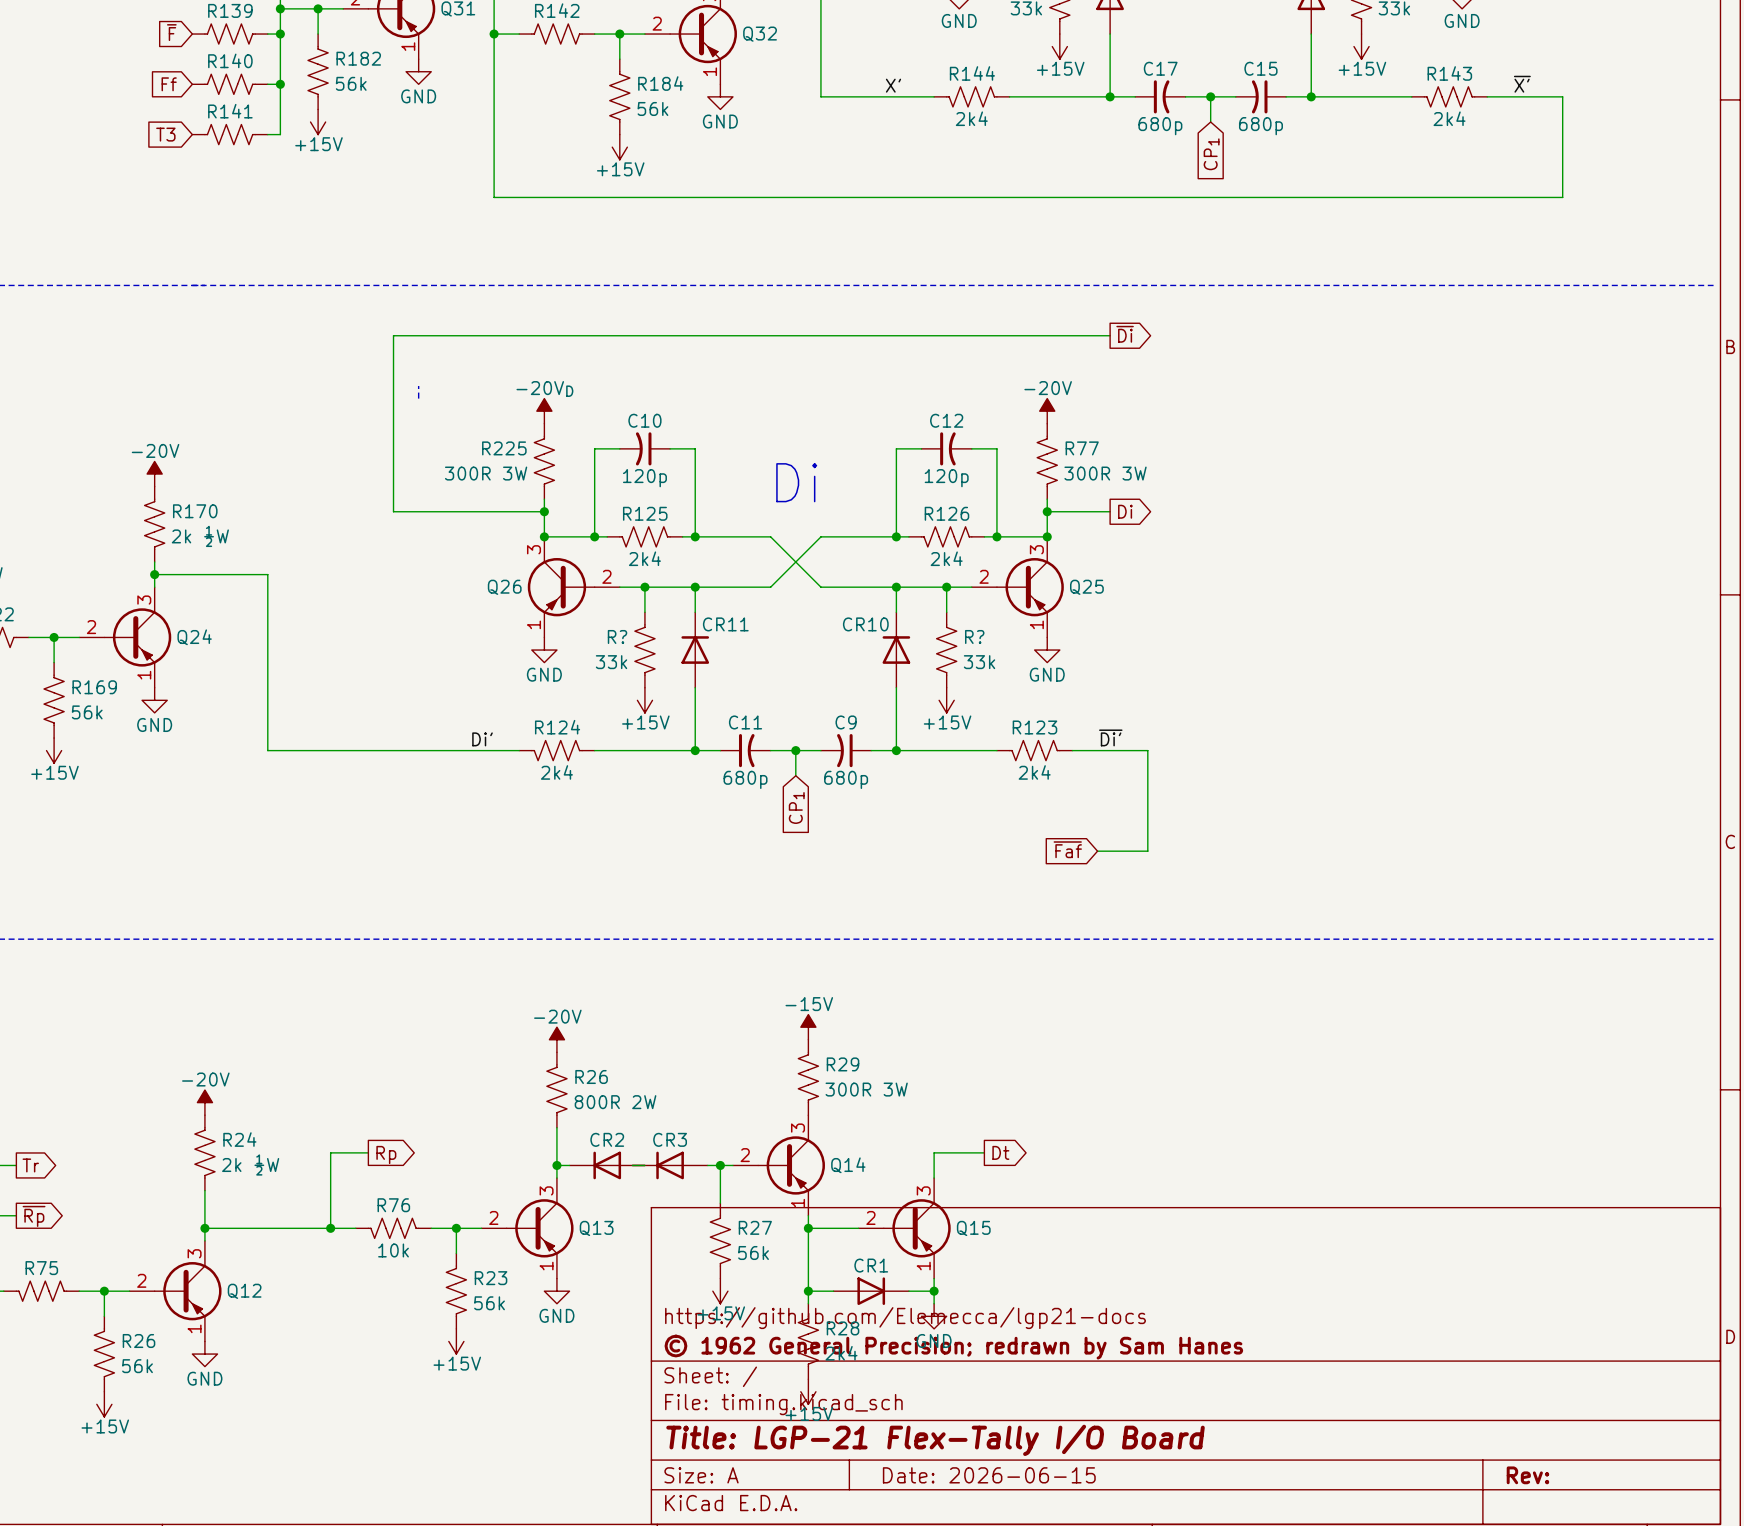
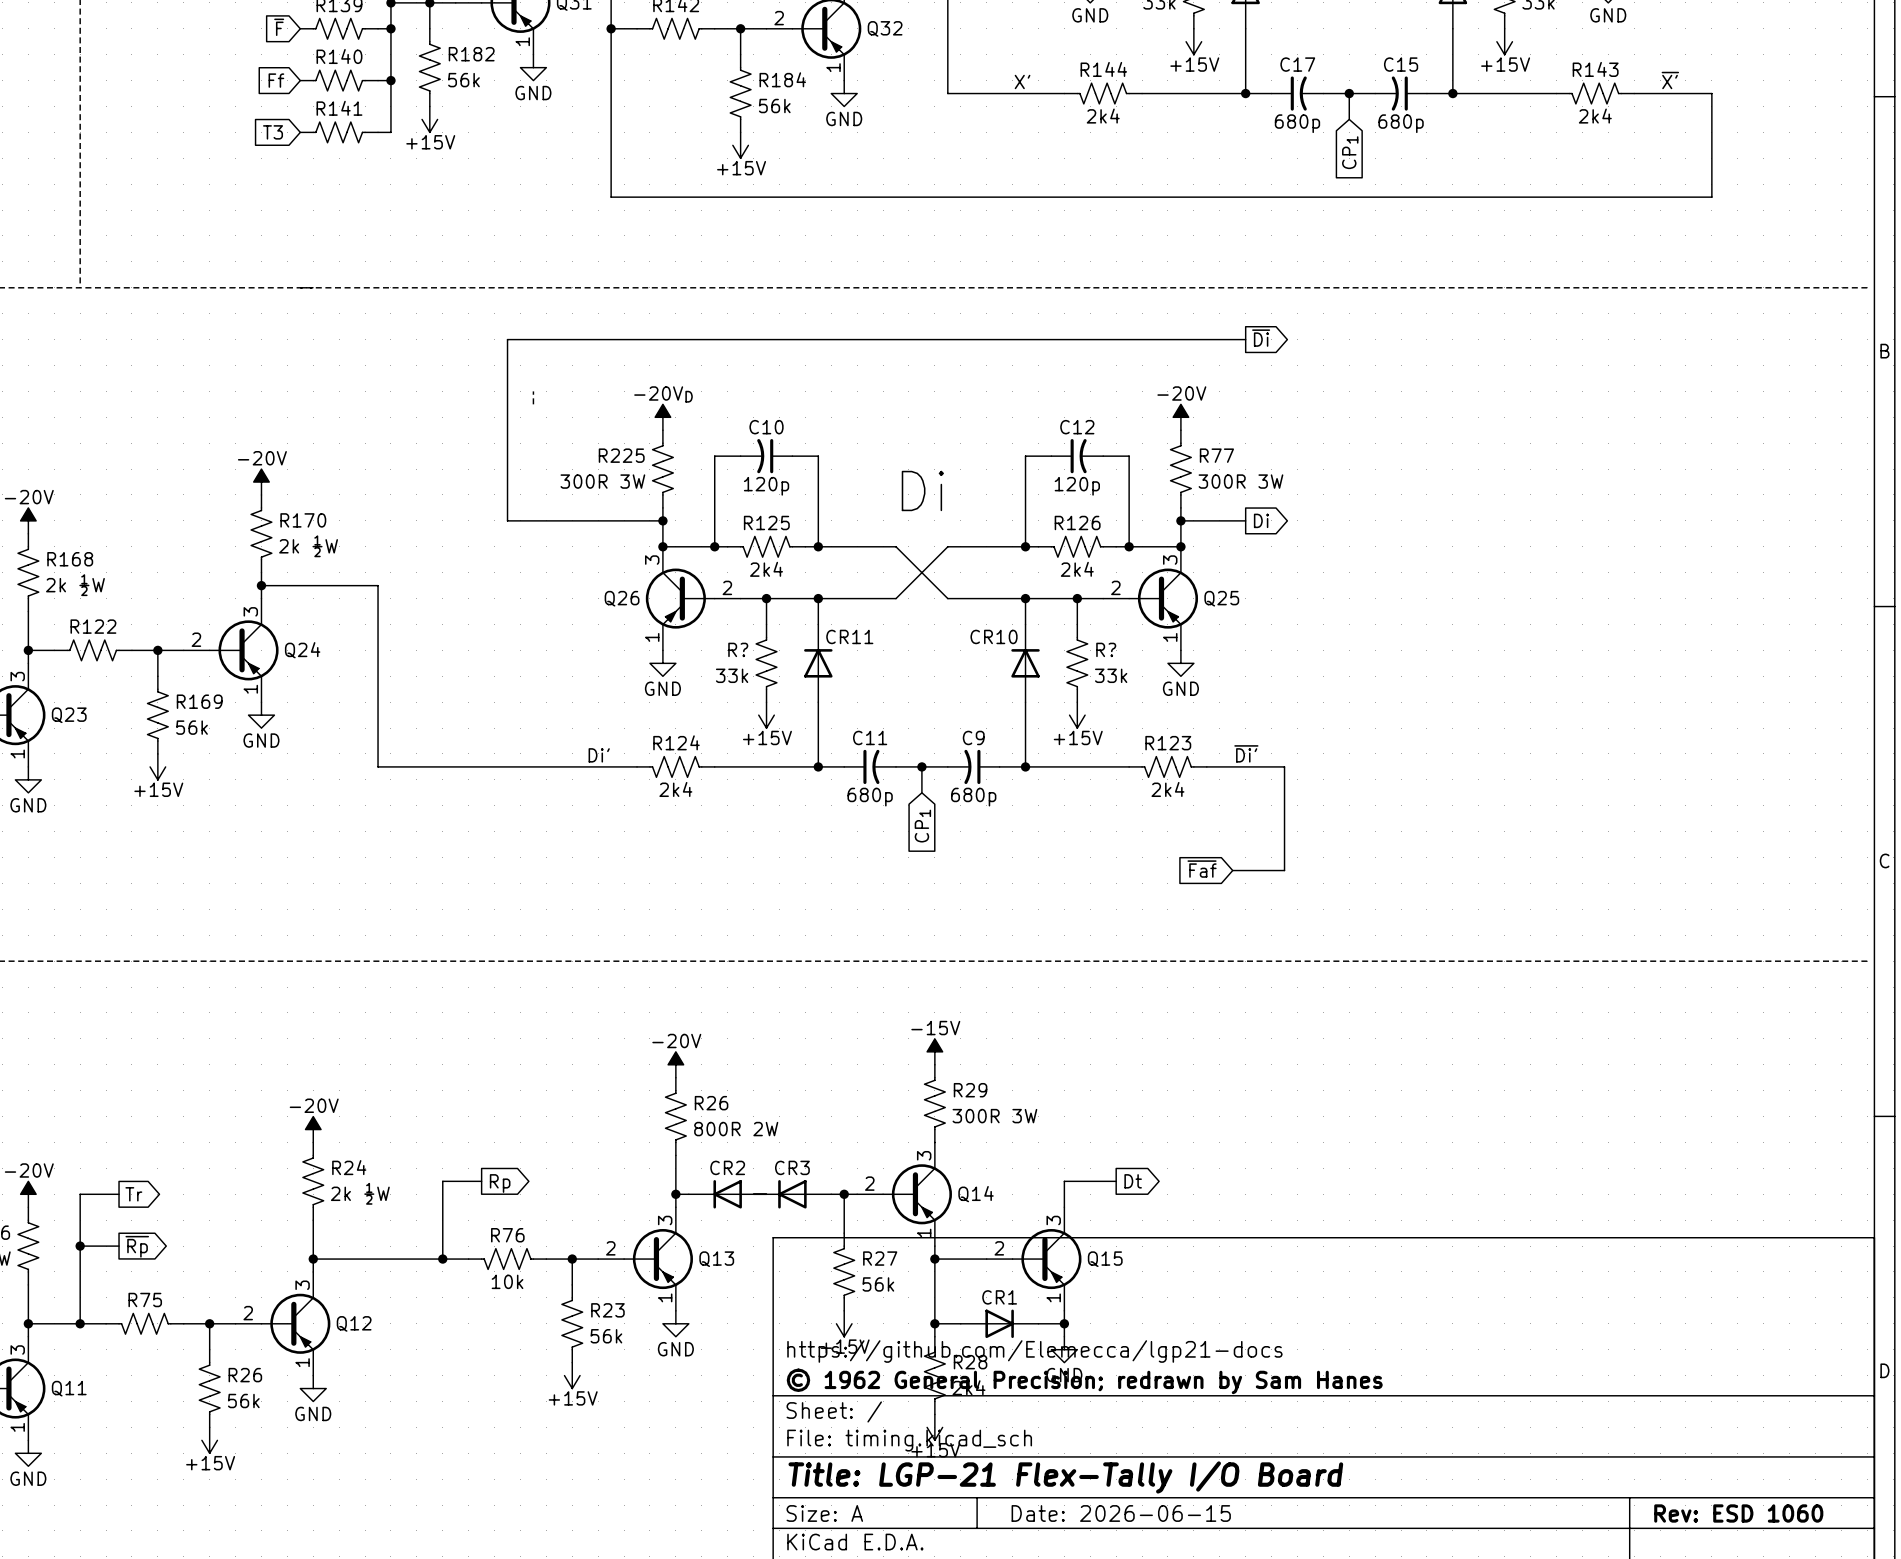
title block: Rev: (1527, 1475) -> Rev: ESD 1060 (1738, 1513)

